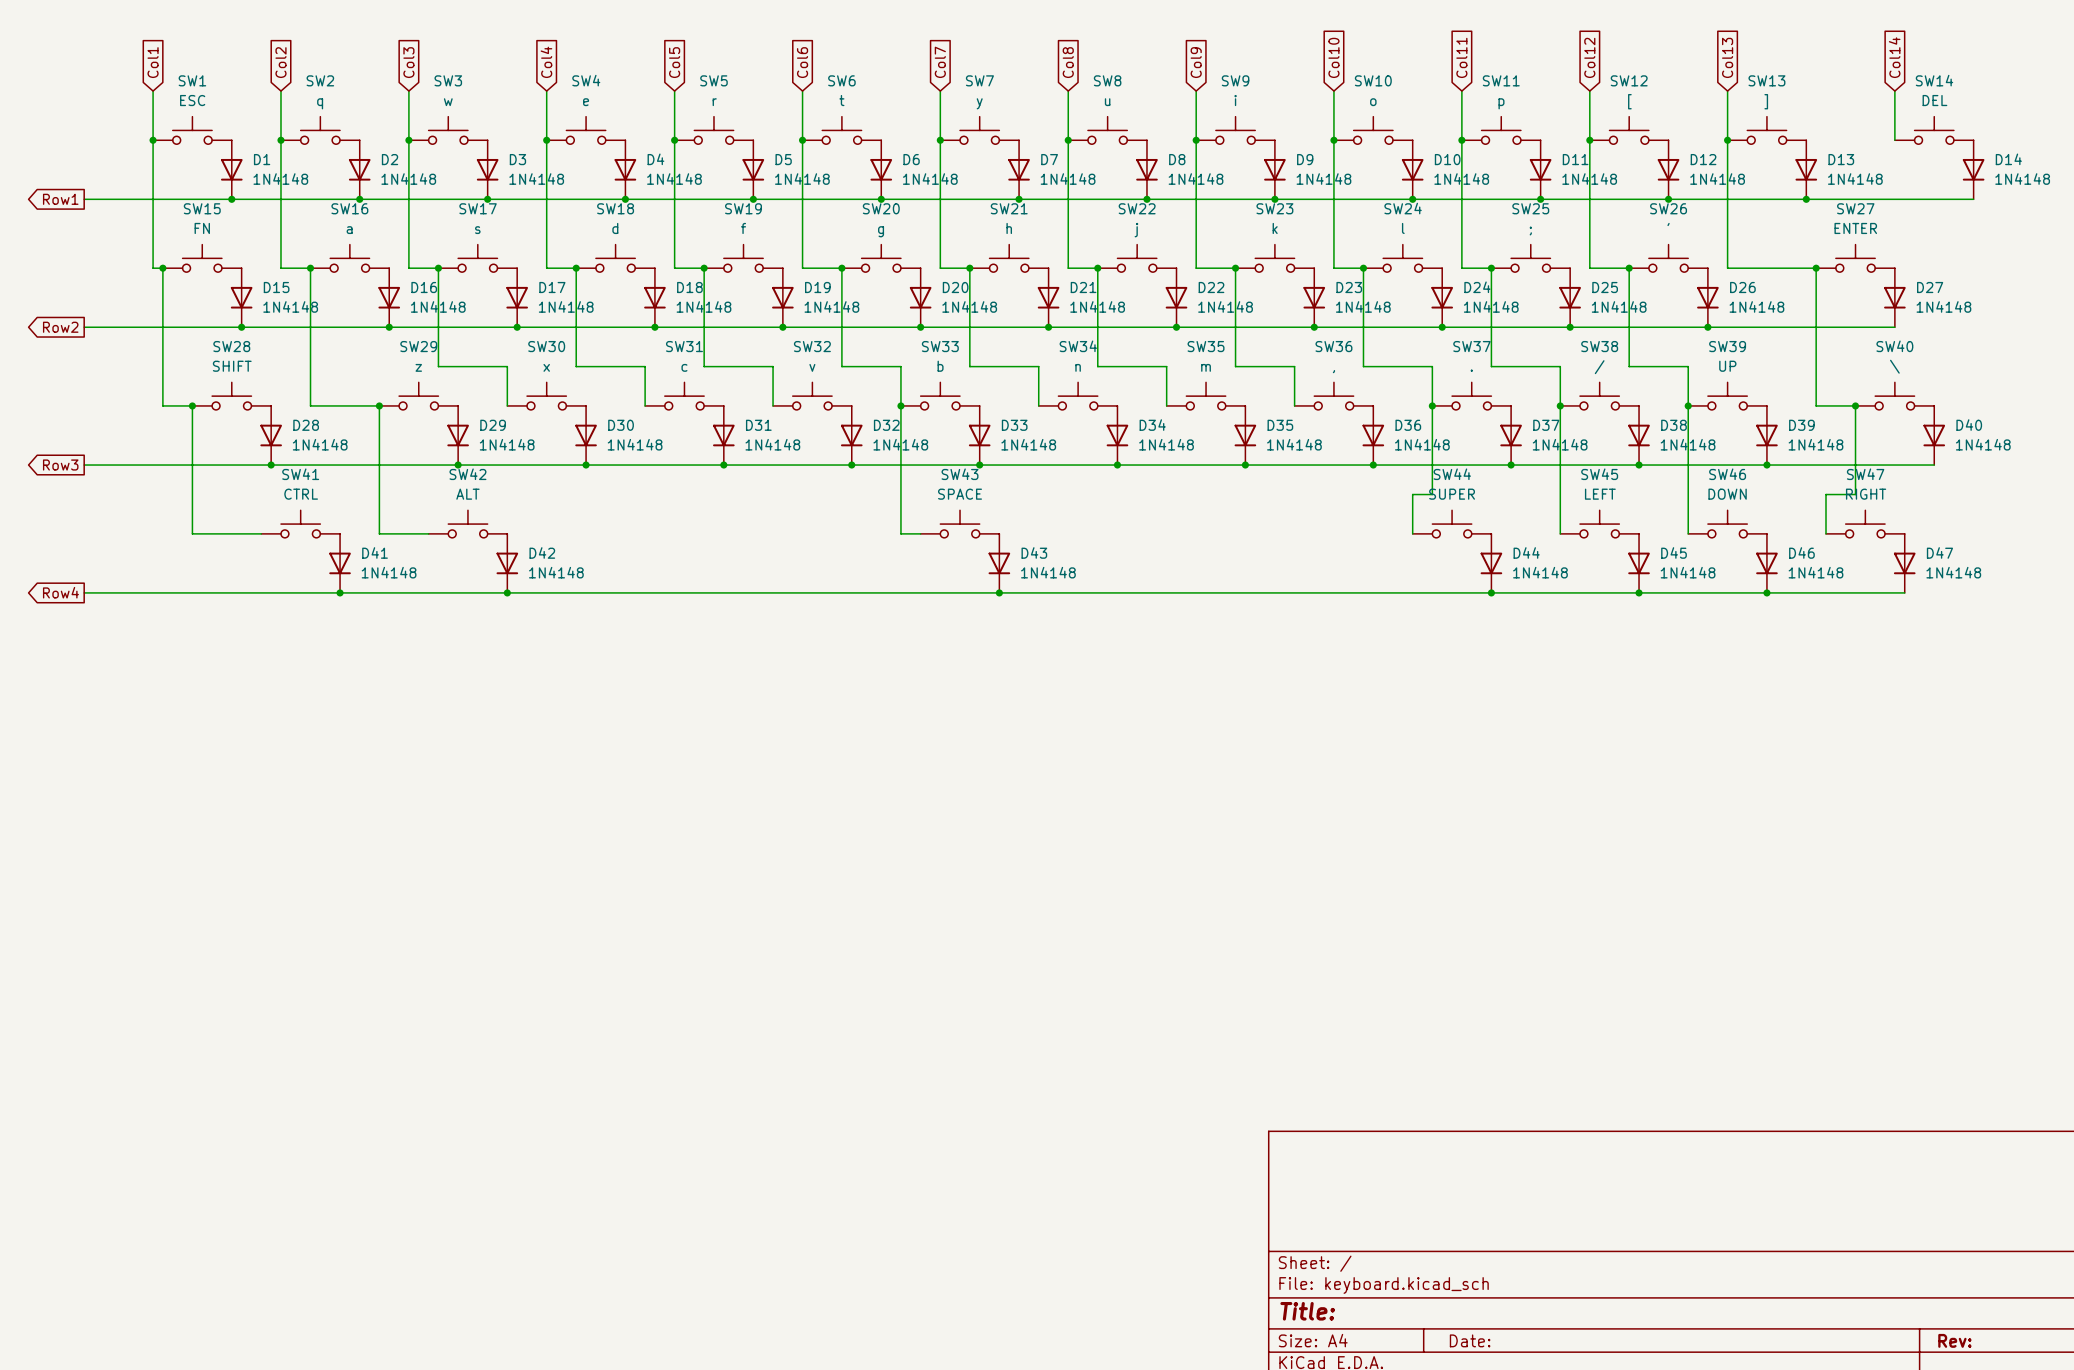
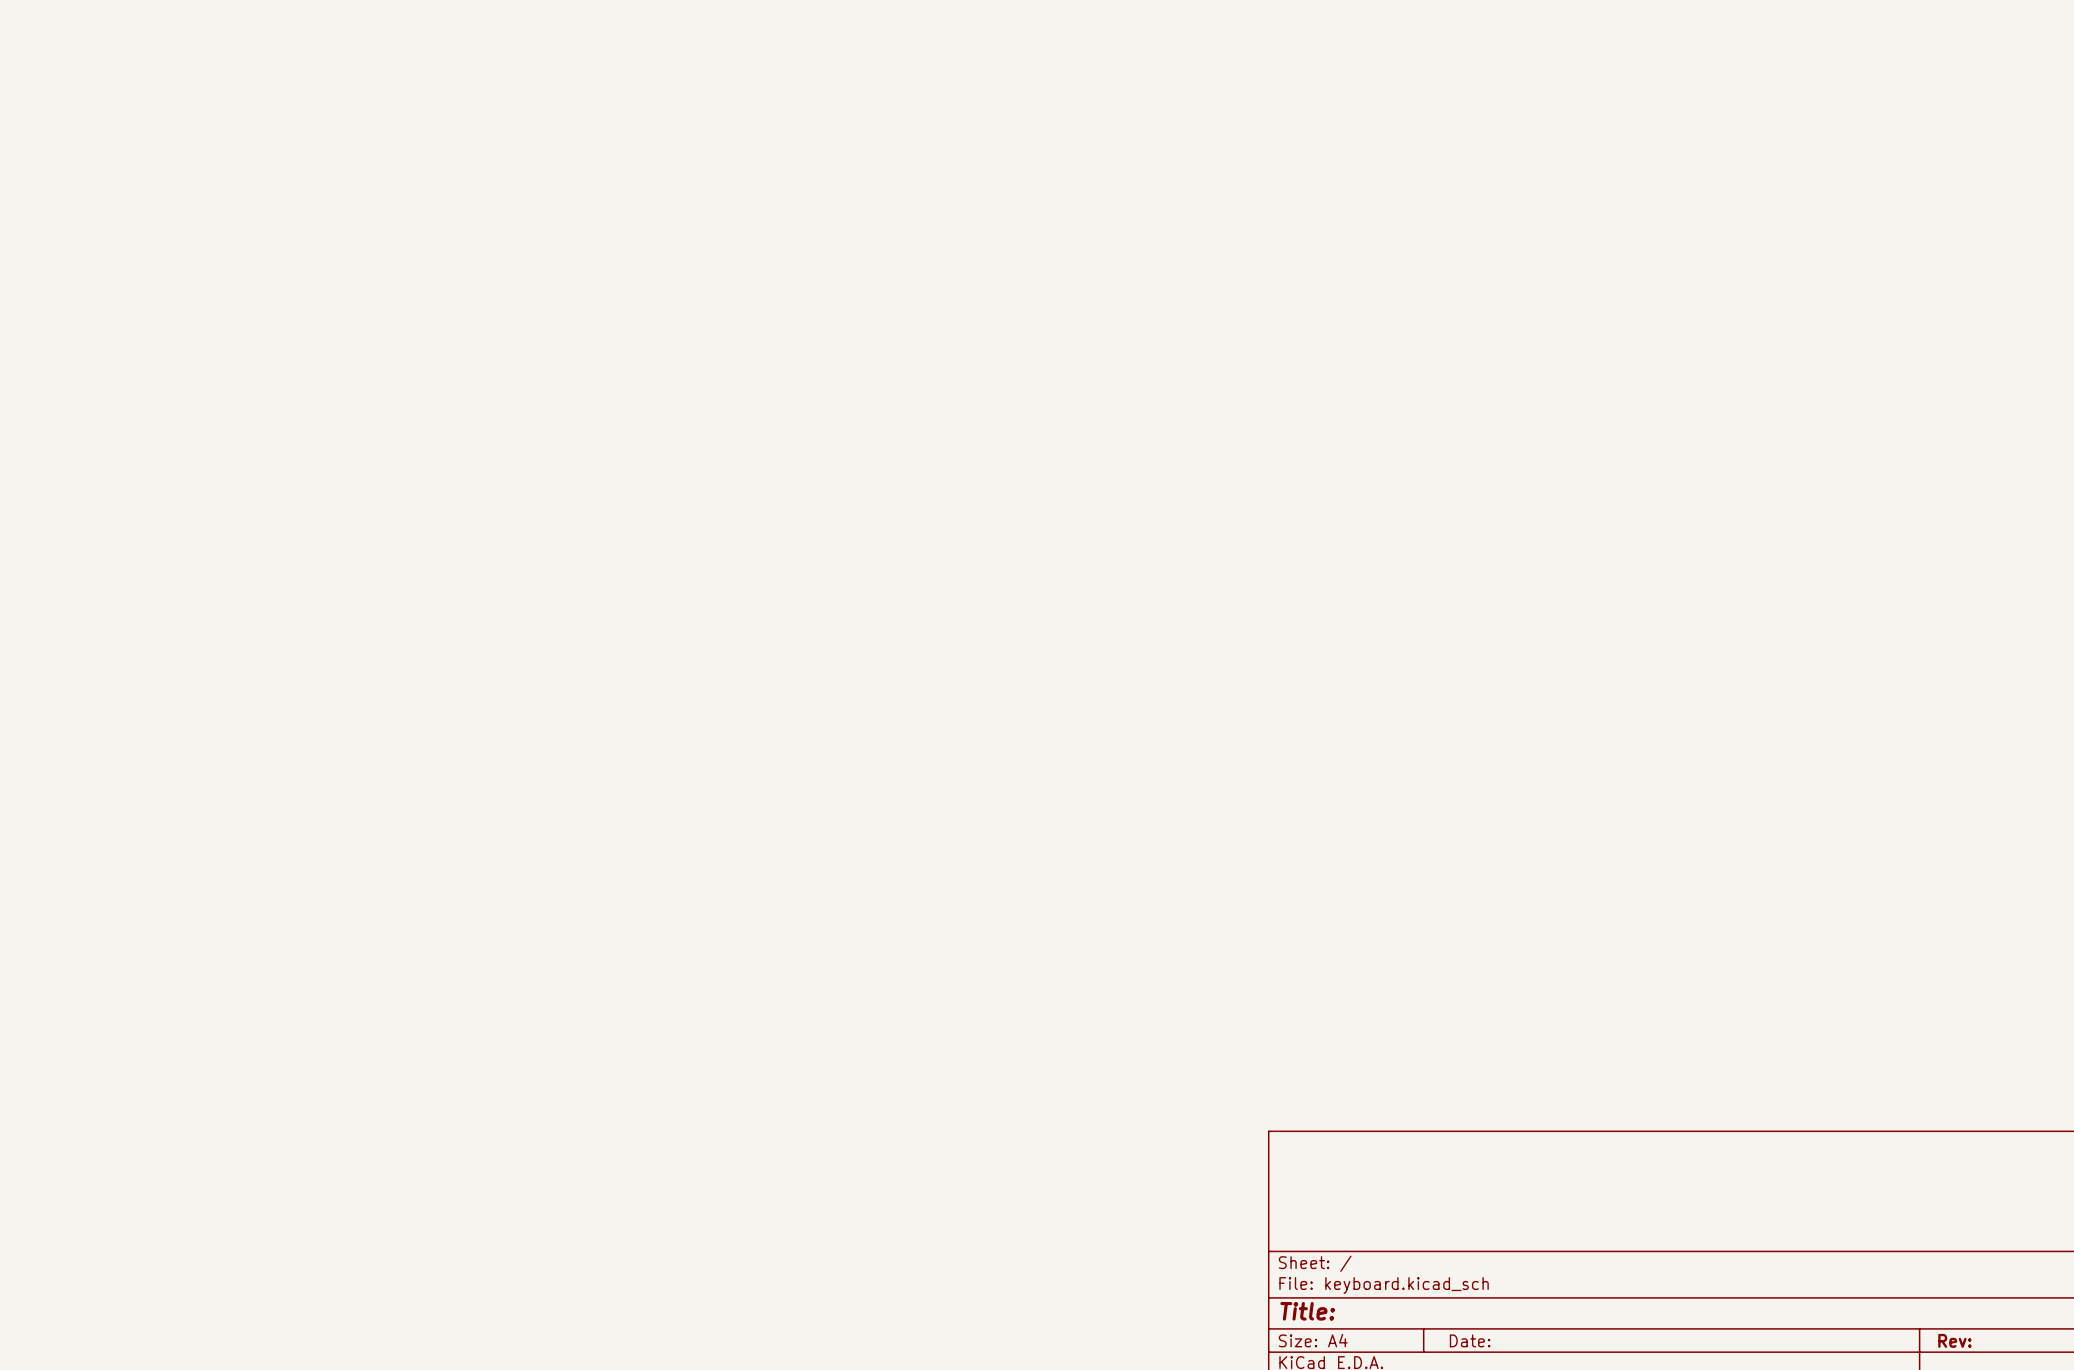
global label: Col10 (1333, 57) -> none
global label: Col11 (1461, 57) -> none
global label: Col12 (1589, 57) -> none
global label: Col13 (1727, 57) -> none
global label: Col14 (1894, 57) -> none
global label: Col1 (153, 62) -> none
global label: Col2 (280, 62) -> none
global label: Col3 (408, 62) -> none
global label: Col4 (546, 62) -> none
global label: Col5 (674, 62) -> none
global label: Col6 (802, 62) -> none
global label: Col7 (940, 62) -> none
global label: Col8 (1068, 62) -> none
global label: Col9 (1196, 62) -> none
wire: (153, 91) (153, 268) (162, 268) (162, 405) (192, 405) (192, 533) (261, 533) -> none
wire: (280, 91) (280, 268) (310, 268) (310, 405) (379, 405) (379, 533) (428, 533) -> none
wire: (408, 91) (408, 268) (438, 268) (438, 366) (507, 366) (507, 405) -> none
wire: (546, 91) (546, 268) (576, 268) (576, 366) (645, 366) (645, 405) -> none
wire: (674, 91) (674, 268) (704, 268) (704, 366) (773, 366) (773, 405) -> none
wire: (802, 91) (802, 268) (841, 268) (841, 366) (900, 366) (900, 533) (920, 533) -> none
wire: (940, 91) (940, 268) (969, 268) (969, 366) (1038, 366) (1038, 405) -> none
wire: (1068, 91) (1068, 268) (1097, 268) (1097, 366) (1166, 366) (1166, 405) -> none
wire: (1196, 91) (1196, 268) (1235, 268) (1235, 366) (1294, 366) (1294, 405) -> none
wire: (1333, 91) (1333, 268) (1363, 268) (1363, 366) (1432, 366) (1432, 494) (1412, 494) (1412, 533) -> none
wire: (1461, 91) (1461, 268) (1491, 268) (1491, 366) (1560, 366) (1560, 533) -> none
wire: (1589, 91) (1589, 268) (1629, 268) (1629, 366) (1688, 366) (1688, 533) -> none
wire: (1727, 91) (1727, 268) (1816, 268) (1816, 405) (1855, 405) (1855, 494) (1826, 494) (1826, 533) -> none
wire: (1894, 91) (1894, 140) -> none
SW1: ESC (192, 130) -> none
SW2: q (320, 130) -> none
SW3: w (448, 130) -> none
SW4: e (586, 130) -> none
SW5: r (713, 130) -> none
SW6: t (841, 130) -> none
SW7: y (979, 130) -> none
SW8: u (1107, 130) -> none
SW9: i (1235, 130) -> none
SW10: o (1373, 130) -> none
SW11: p (1501, 130) -> none
SW12: [ (1629, 130) -> none
SW13: ] (1766, 130) -> none
SW14: DEL (1934, 130) -> none
junction: (153, 140) -> none
junction: (280, 140) -> none
junction: (408, 140) -> none
junction: (546, 140) -> none
junction: (674, 140) -> none
junction: (802, 140) -> none
junction: (940, 140) -> none
junction: (1068, 140) -> none
junction: (1196, 140) -> none
junction: (1333, 140) -> none
junction: (1461, 140) -> none
junction: (1589, 140) -> none
junction: (1727, 140) -> none
D1: 1N4148 (231, 169) -> none
D2: 1N4148 (359, 169) -> none
D3: 1N4148 (487, 169) -> none
D4: 1N4148 (625, 169) -> none
D5: 1N4148 (753, 169) -> none
D6: 1N4148 (881, 169) -> none
D7: 1N4148 (1019, 169) -> none
D8: 1N4148 (1146, 169) -> none
D9: 1N4148 (1274, 169) -> none
D10: 1N4148 (1412, 169) -> none
D11: 1N4148 (1540, 169) -> none
D12: 1N4148 (1668, 169) -> none
D13: 1N4148 (1806, 169) -> none
D14: 1N4148 (1973, 169) -> none
global label: Row1 (60, 199) -> none
wire: (84, 199) (1973, 199) -> none
junction: (231, 199) -> none
junction: (359, 199) -> none
junction: (487, 199) -> none
junction: (625, 199) -> none
junction: (753, 199) -> none
junction: (881, 199) -> none
junction: (1019, 199) -> none
junction: (1146, 199) -> none
junction: (1274, 199) -> none
junction: (1412, 199) -> none
junction: (1540, 199) -> none
junction: (1668, 199) -> none
junction: (1806, 199) -> none
SW15: FN (202, 258) -> none
SW16: a (349, 258) -> none
SW17: s (477, 258) -> none
SW18: d (615, 258) -> none
SW19: f (743, 258) -> none
SW20: g (881, 258) -> none
SW21: h (1009, 258) -> none
SW22: j (1137, 258) -> none
SW23: k (1274, 258) -> none
SW24: l (1402, 258) -> none
SW25: ; (1530, 258) -> none
SW26: ' (1668, 258) -> none
SW27: ENTER (1855, 258) -> none
junction: (162, 268) -> none
junction: (310, 268) -> none
junction: (438, 268) -> none
junction: (576, 268) -> none
junction: (704, 268) -> none
junction: (841, 268) -> none
junction: (969, 268) -> none
junction: (1097, 268) -> none
junction: (1235, 268) -> none
junction: (1363, 268) -> none
junction: (1491, 268) -> none
junction: (1629, 268) -> none
junction: (1816, 268) -> none
D15: 1N4148 (241, 297) -> none
D16: 1N4148 (389, 297) -> none
D17: 1N4148 (517, 297) -> none
D18: 1N4148 (654, 297) -> none
D19: 1N4148 (782, 297) -> none
D20: 1N4148 (920, 297) -> none
D21: 1N4148 (1048, 297) -> none
D22: 1N4148 (1176, 297) -> none
D23: 1N4148 (1314, 297) -> none
D24: 1N4148 (1442, 297) -> none
D25: 1N4148 (1570, 297) -> none
D26: 1N4148 (1707, 297) -> none
D27: 1N4148 (1894, 297) -> none
global label: Row2 (60, 327) -> none
wire: (84, 327) (1894, 327) -> none
junction: (241, 327) -> none
junction: (389, 327) -> none
junction: (517, 327) -> none
junction: (654, 327) -> none
junction: (782, 327) -> none
junction: (920, 327) -> none
junction: (1048, 327) -> none
junction: (1176, 327) -> none
junction: (1314, 327) -> none
junction: (1442, 327) -> none
junction: (1570, 327) -> none
junction: (1707, 327) -> none
SW28: SHIFT (231, 396) -> none
SW29: z (418, 396) -> none
SW30: x (546, 396) -> none
SW31: c (684, 396) -> none
SW32: v (812, 396) -> none
SW33: b (940, 396) -> none
SW34: n (1078, 396) -> none
SW35: m (1206, 396) -> none
SW36: , (1333, 396) -> none
SW37: . (1471, 396) -> none
SW38: / (1599, 396) -> none
SW39: UP (1727, 396) -> none
SW40: \ (1894, 396) -> none
junction: (192, 405) -> none
junction: (379, 405) -> none
junction: (900, 405) -> none
junction: (1432, 405) -> none
junction: (1560, 405) -> none
junction: (1688, 405) -> none
junction: (1855, 405) -> none
D28: 1N4148 (271, 435) -> none
D29: 1N4148 (458, 435) -> none
D30: 1N4148 (586, 435) -> none
D31: 1N4148 (723, 435) -> none
D32: 1N4148 (851, 435) -> none
D33: 1N4148 (979, 435) -> none
D34: 1N4148 (1117, 435) -> none
D35: 1N4148 (1245, 435) -> none
D36: 1N4148 (1373, 435) -> none
D37: 1N4148 (1511, 435) -> none
D38: 1N4148 (1639, 435) -> none
D39: 1N4148 (1766, 435) -> none
D40: 1N4148 (1934, 435) -> none
global label: Row3 (60, 465) -> none
wire: (84, 465) (1934, 465) -> none
junction: (271, 465) -> none
junction: (458, 465) -> none
junction: (586, 465) -> none
junction: (723, 465) -> none
junction: (851, 465) -> none
junction: (979, 465) -> none
junction: (1117, 465) -> none
junction: (1245, 465) -> none
junction: (1373, 465) -> none
junction: (1511, 465) -> none
junction: (1639, 465) -> none
junction: (1766, 465) -> none
SW41: CTRL (300, 524) -> none
SW42: ALT (467, 524) -> none
SW43: SPACE (960, 524) -> none
SW44: SUPER (1452, 524) -> none
SW45: LEFT (1599, 524) -> none
SW46: DOWN (1727, 524) -> none
SW47: RIGHT (1865, 524) -> none
D41: 1N4148 (340, 563) -> none
D42: 1N4148 (507, 563) -> none
D43: 1N4148 (999, 563) -> none
D44: 1N4148 (1491, 563) -> none
D45: 1N4148 (1639, 563) -> none
D46: 1N4148 (1766, 563) -> none
D47: 1N4148 (1904, 563) -> none
global label: Row4 (60, 592) -> none
wire: (84, 592) (1904, 592) -> none
junction: (340, 592) -> none
junction: (507, 592) -> none
junction: (999, 592) -> none
junction: (1491, 592) -> none
junction: (1639, 592) -> none
junction: (1766, 592) -> none

